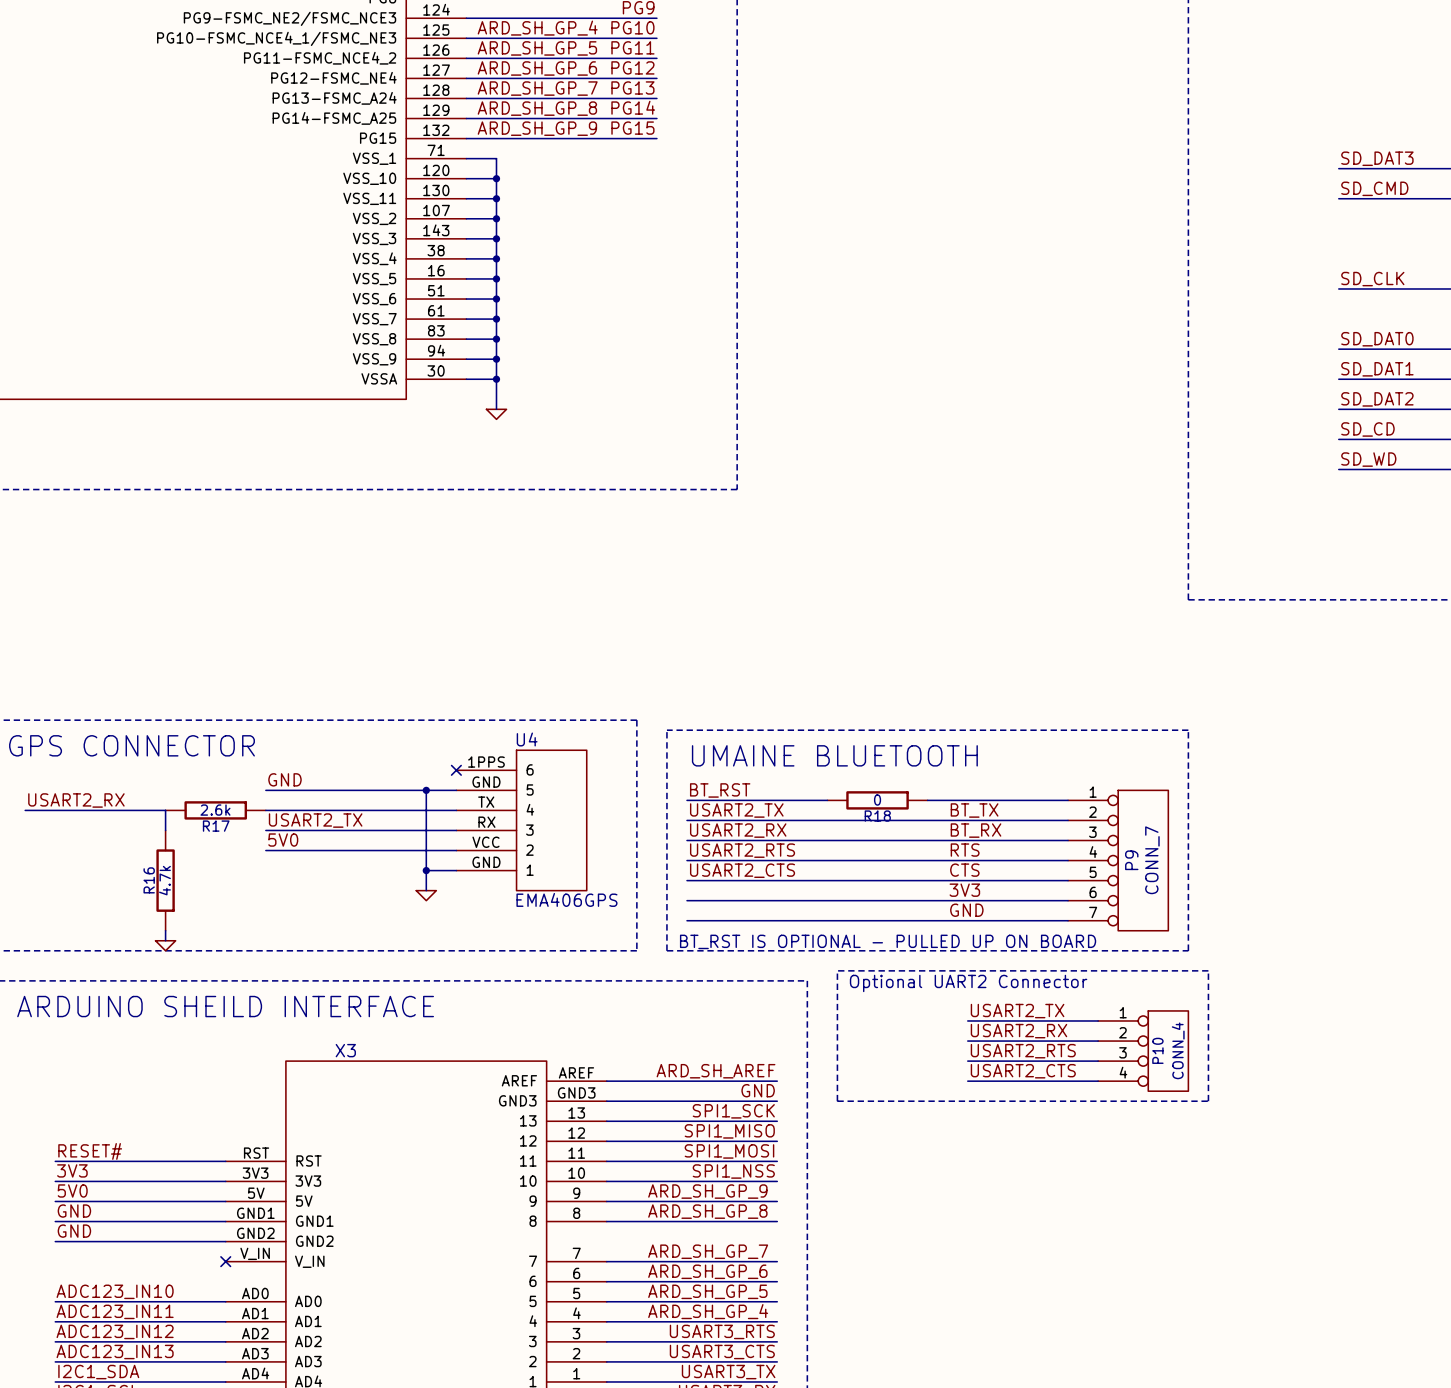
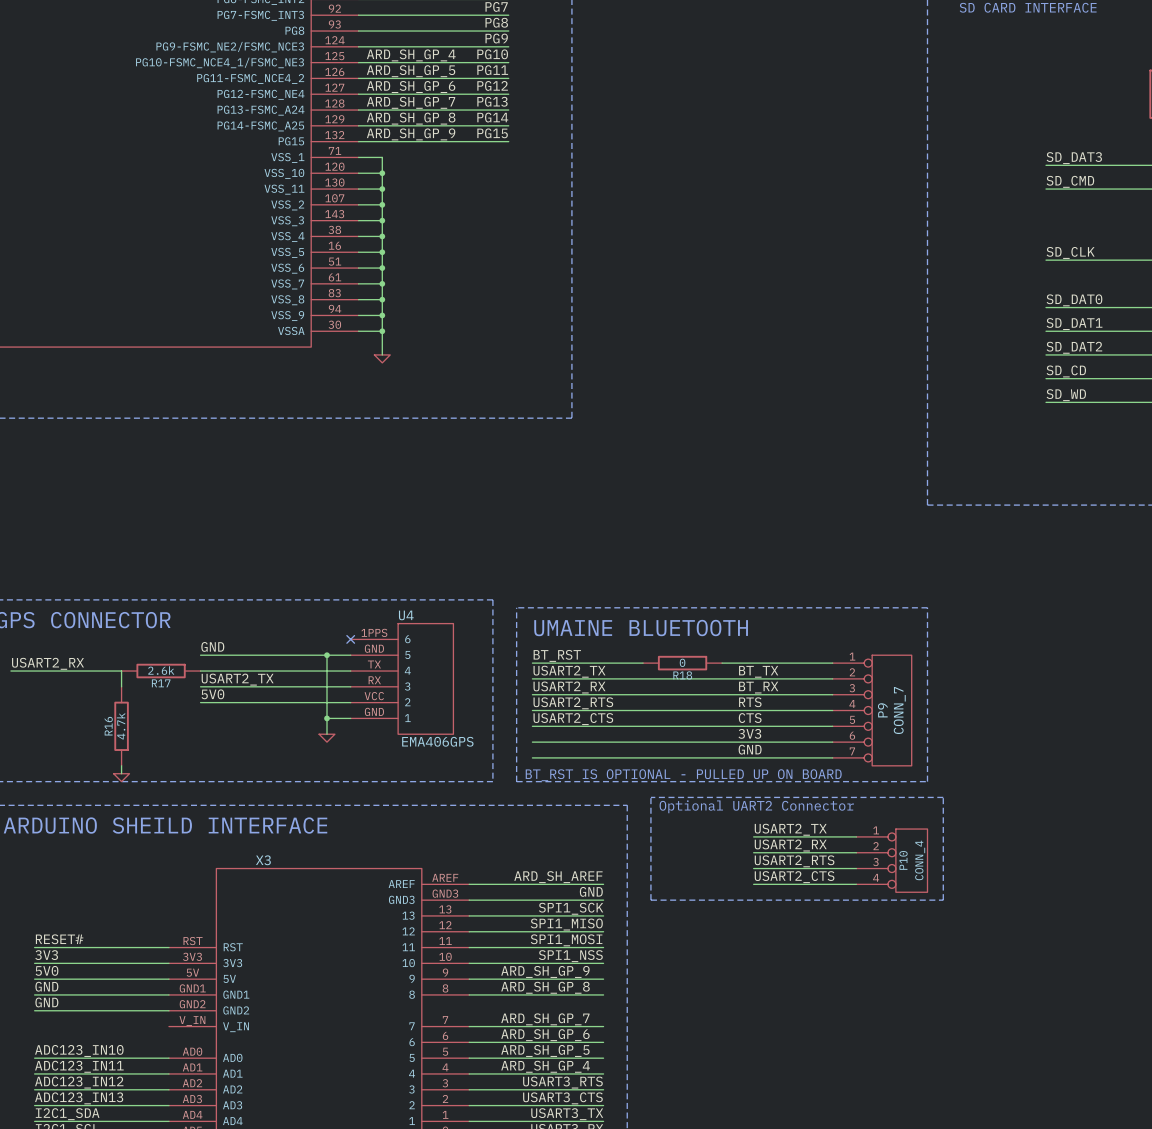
no-connect mark: (225, 1261) -> none

